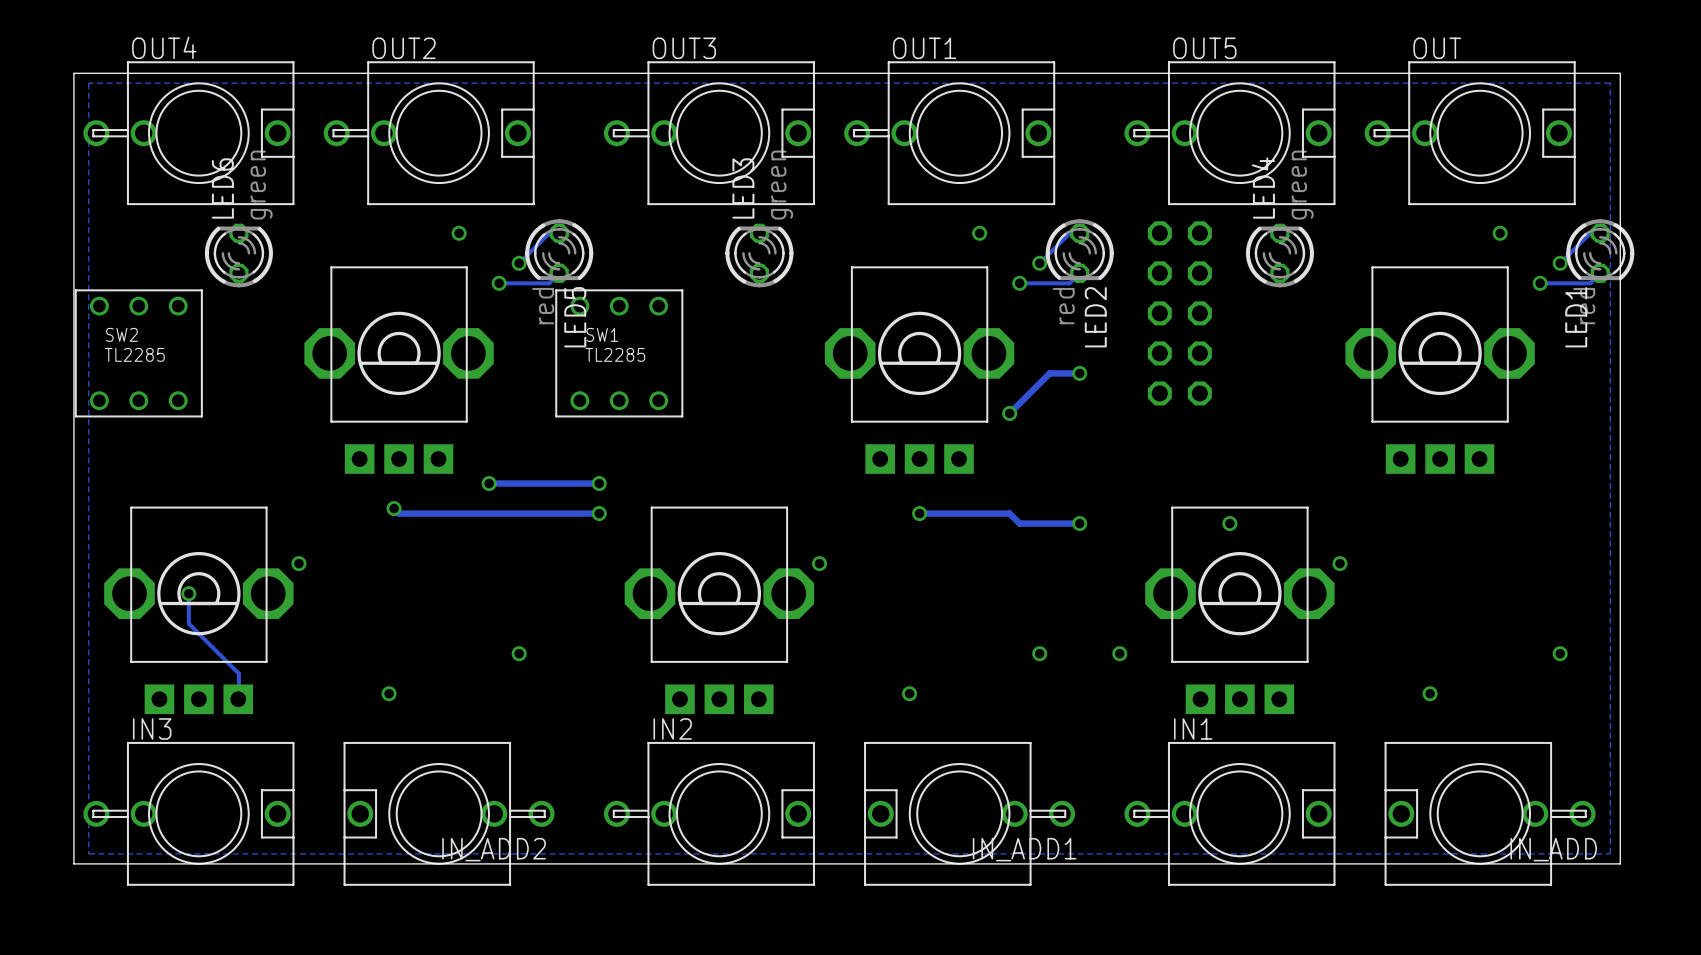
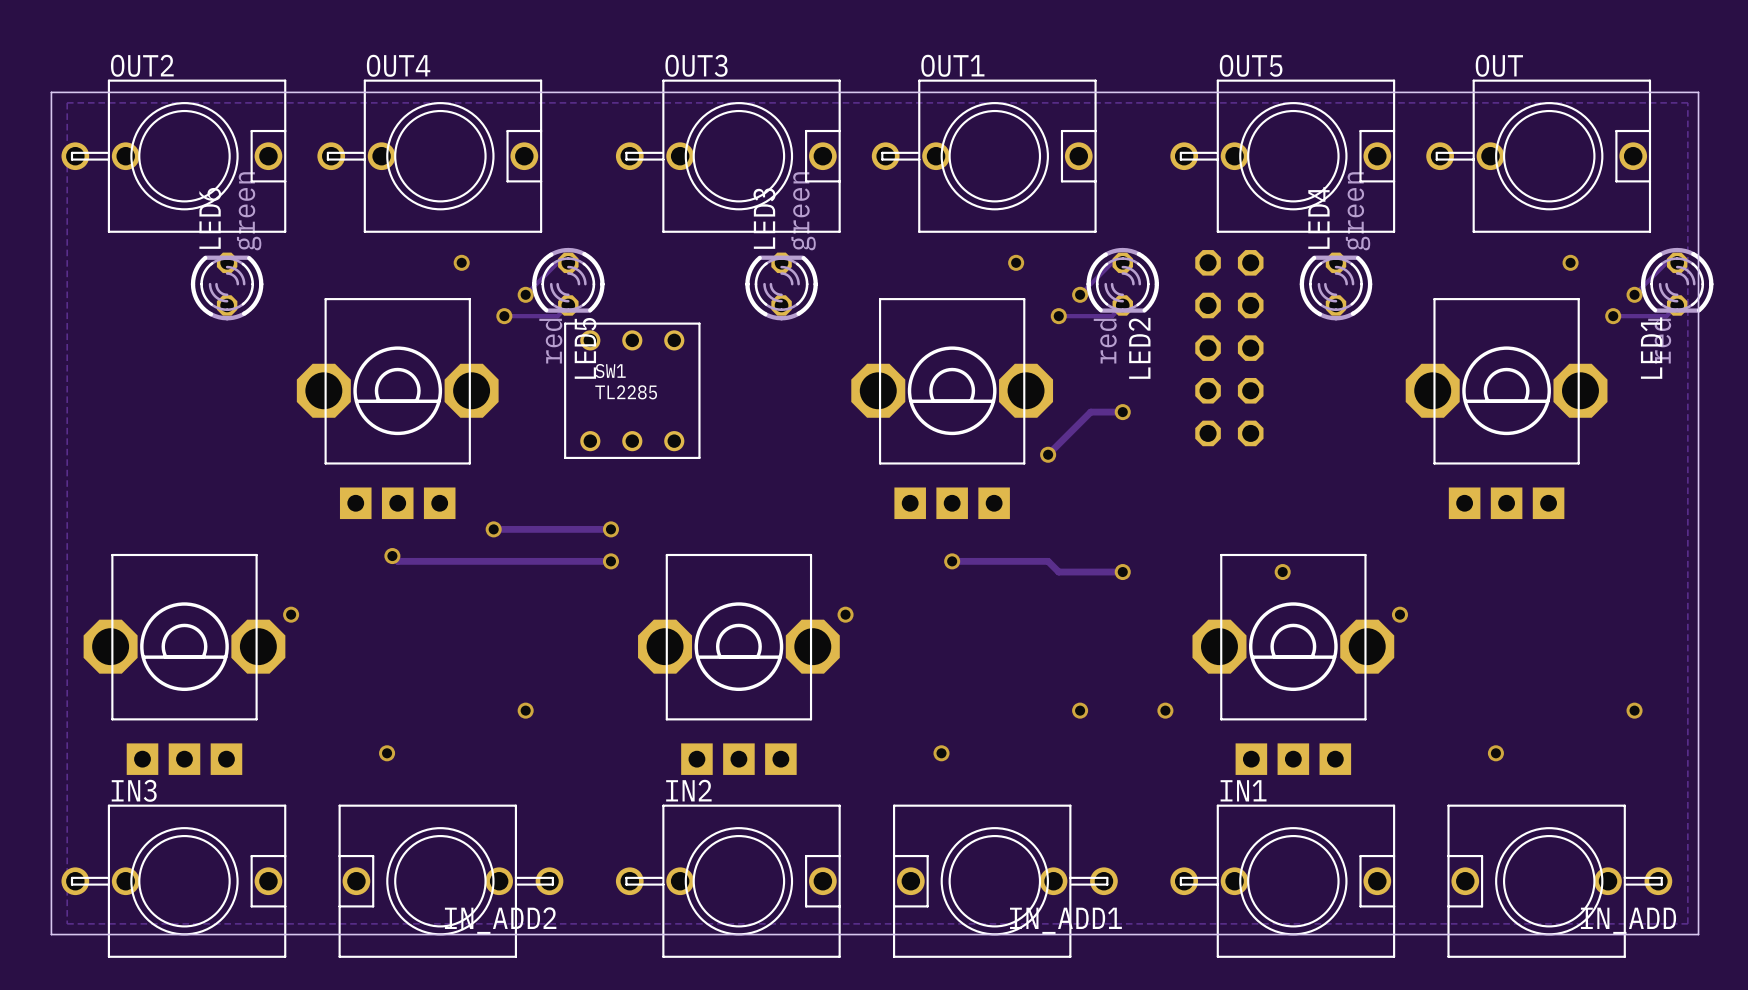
OUT4 name: OUT4 (164, 47) -> OUT2 (142, 65)
OUT2 name: OUT2 (404, 48) -> OUT4 (398, 65)
SW2: TL2285 (138, 353) -> none
track: (188, 593) (188, 623) (238, 673) (238, 699) -> none
via: (188, 593) -> none

